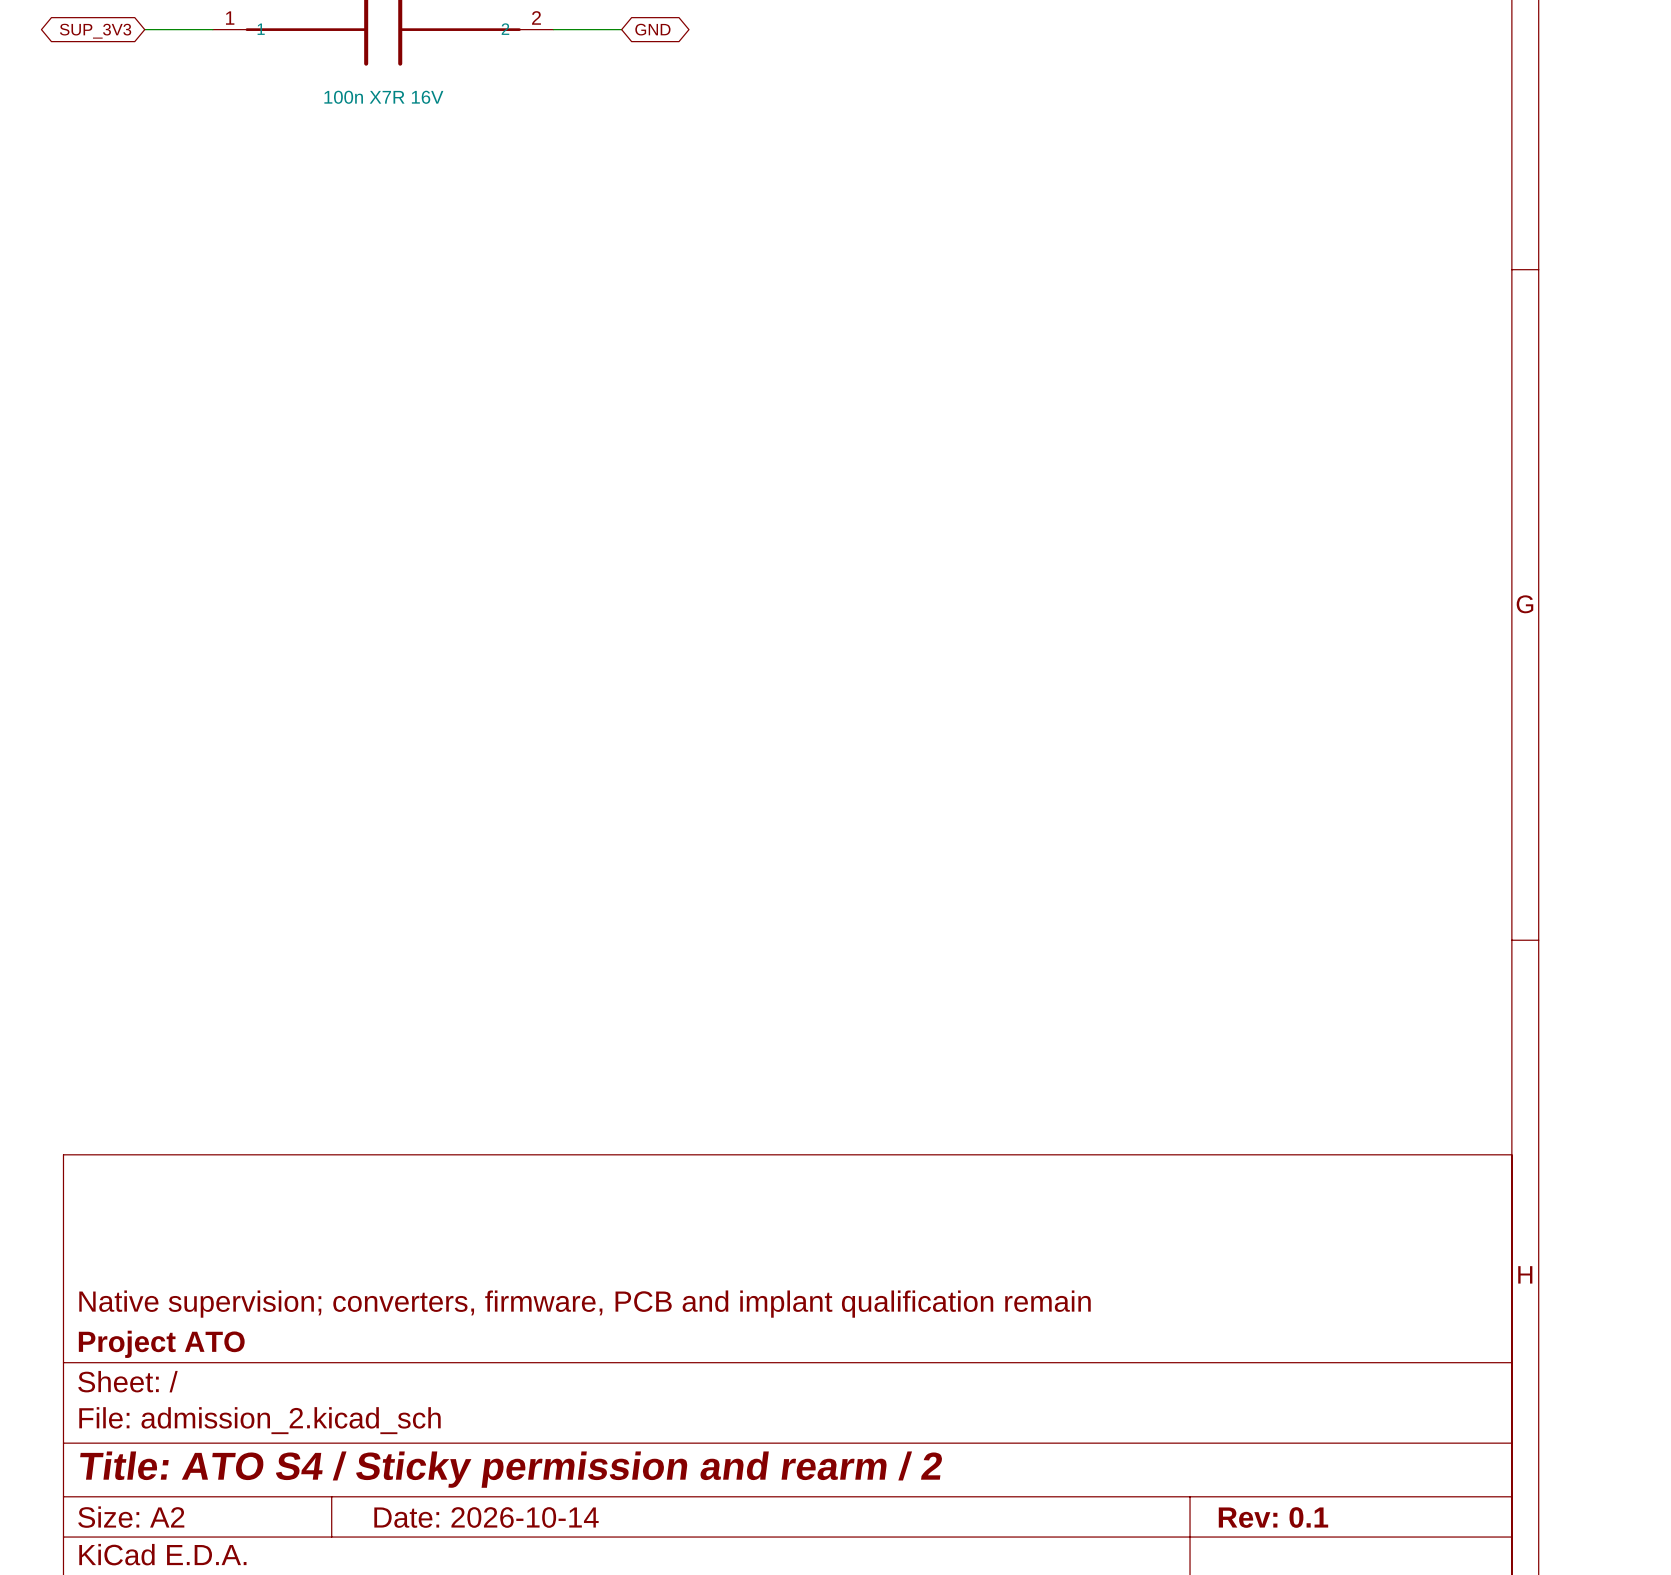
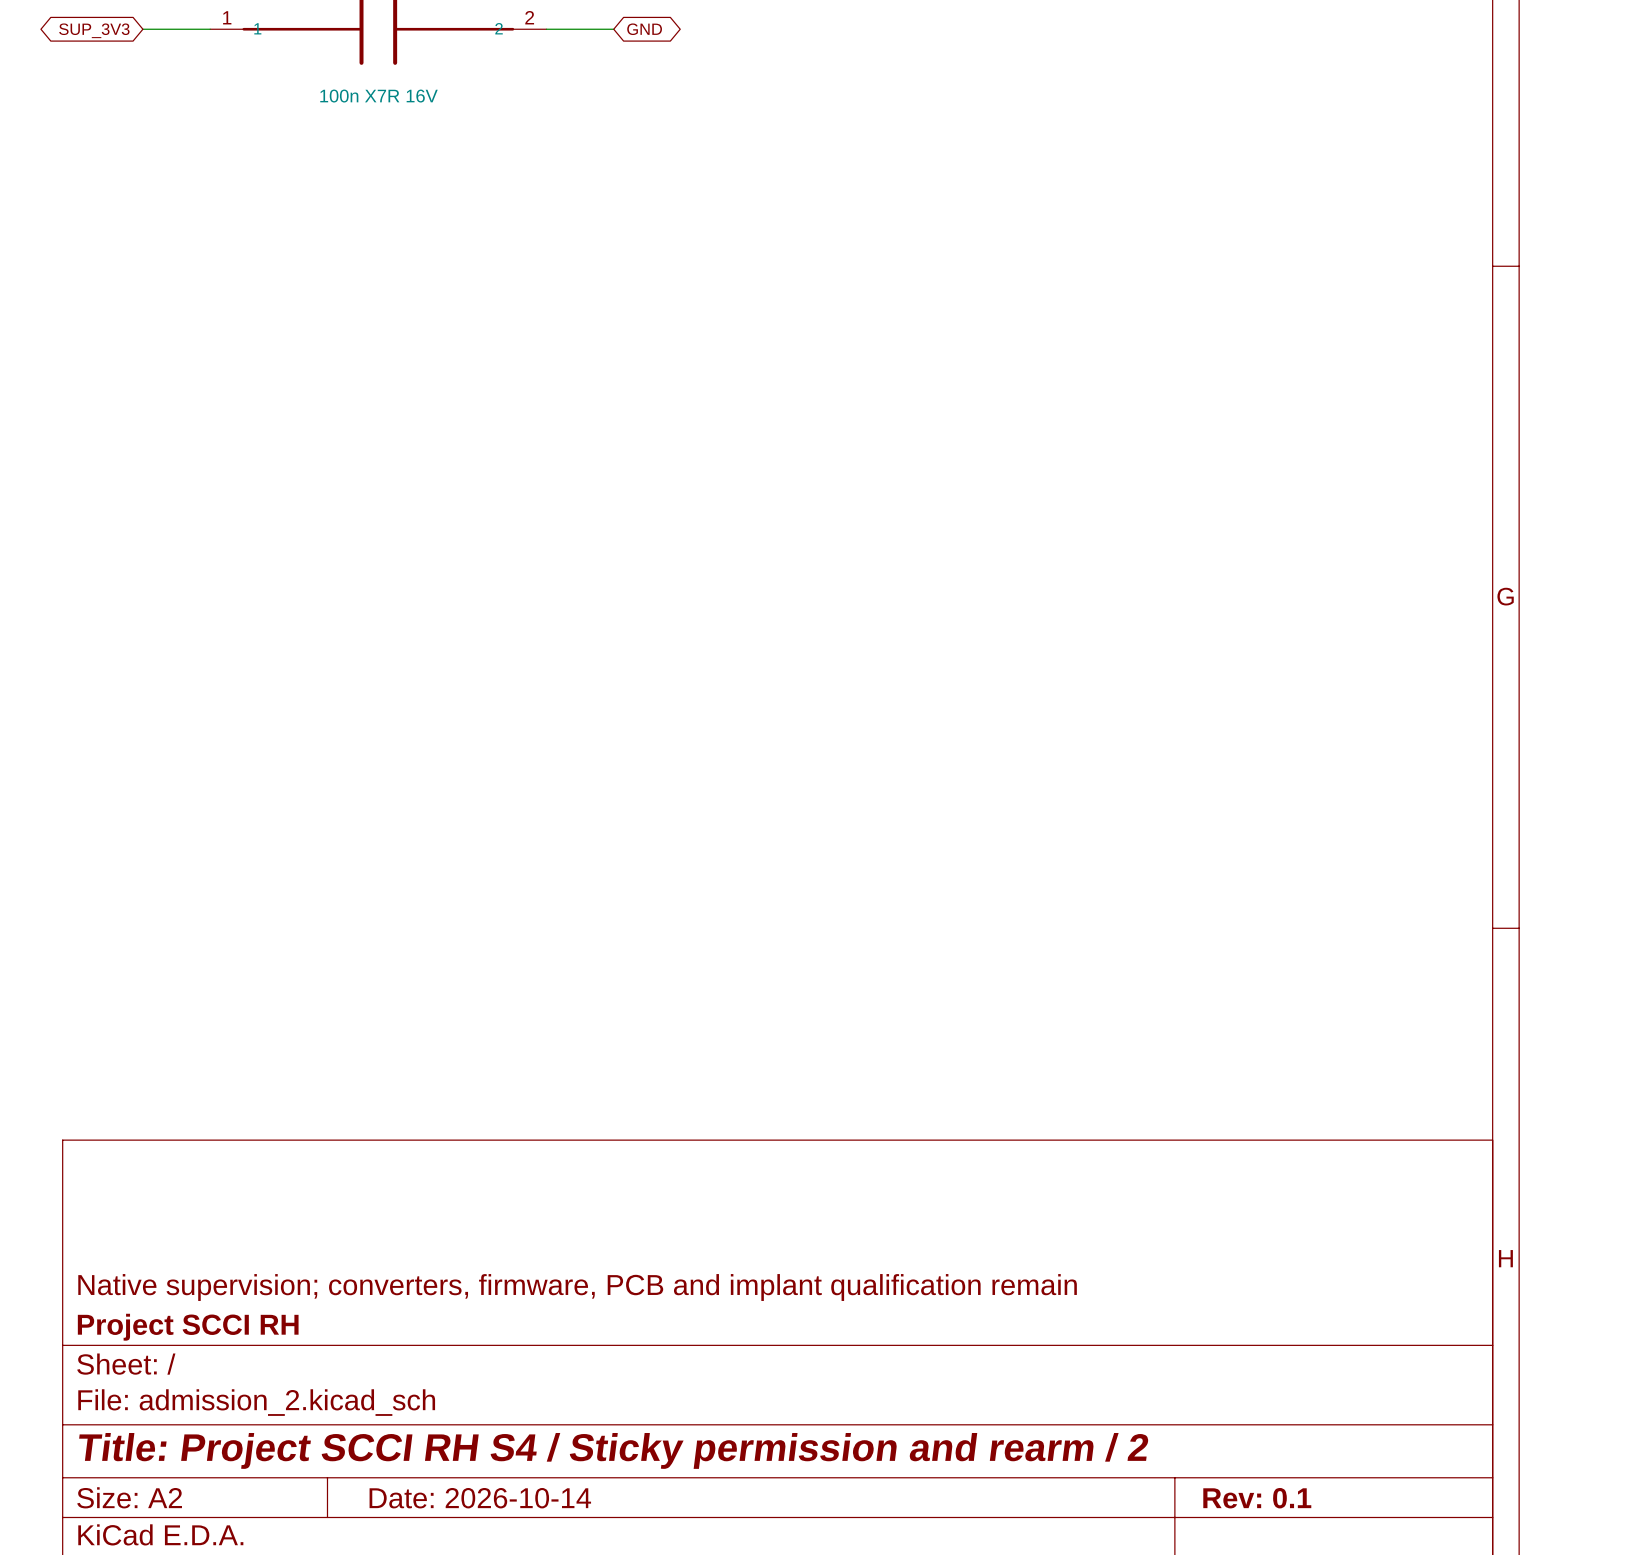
title block: Project ATO (161, 1344) -> Project SCCI RH (188, 1327)
title block: Title: ATO S4 / Sticky permission and rearm / 2 (511, 1469) -> Title: Project SCCI RH S4 / Sticky permission and rearm / 2 (613, 1450)

